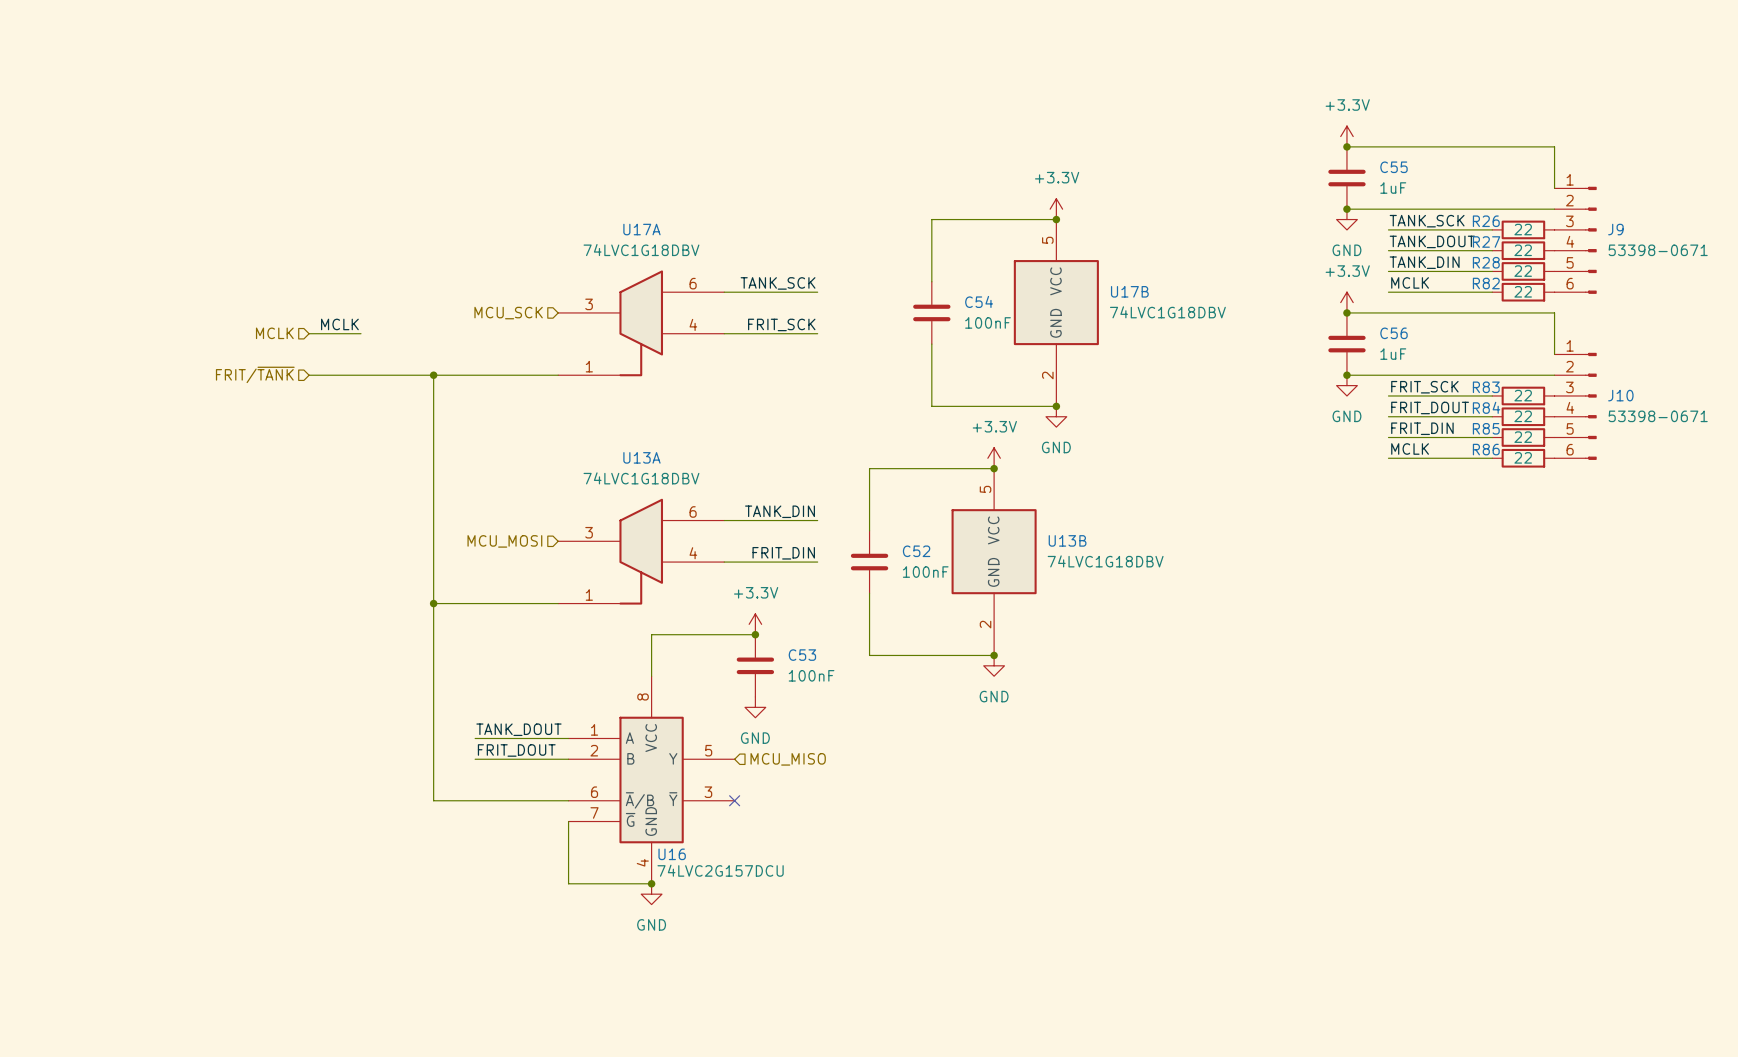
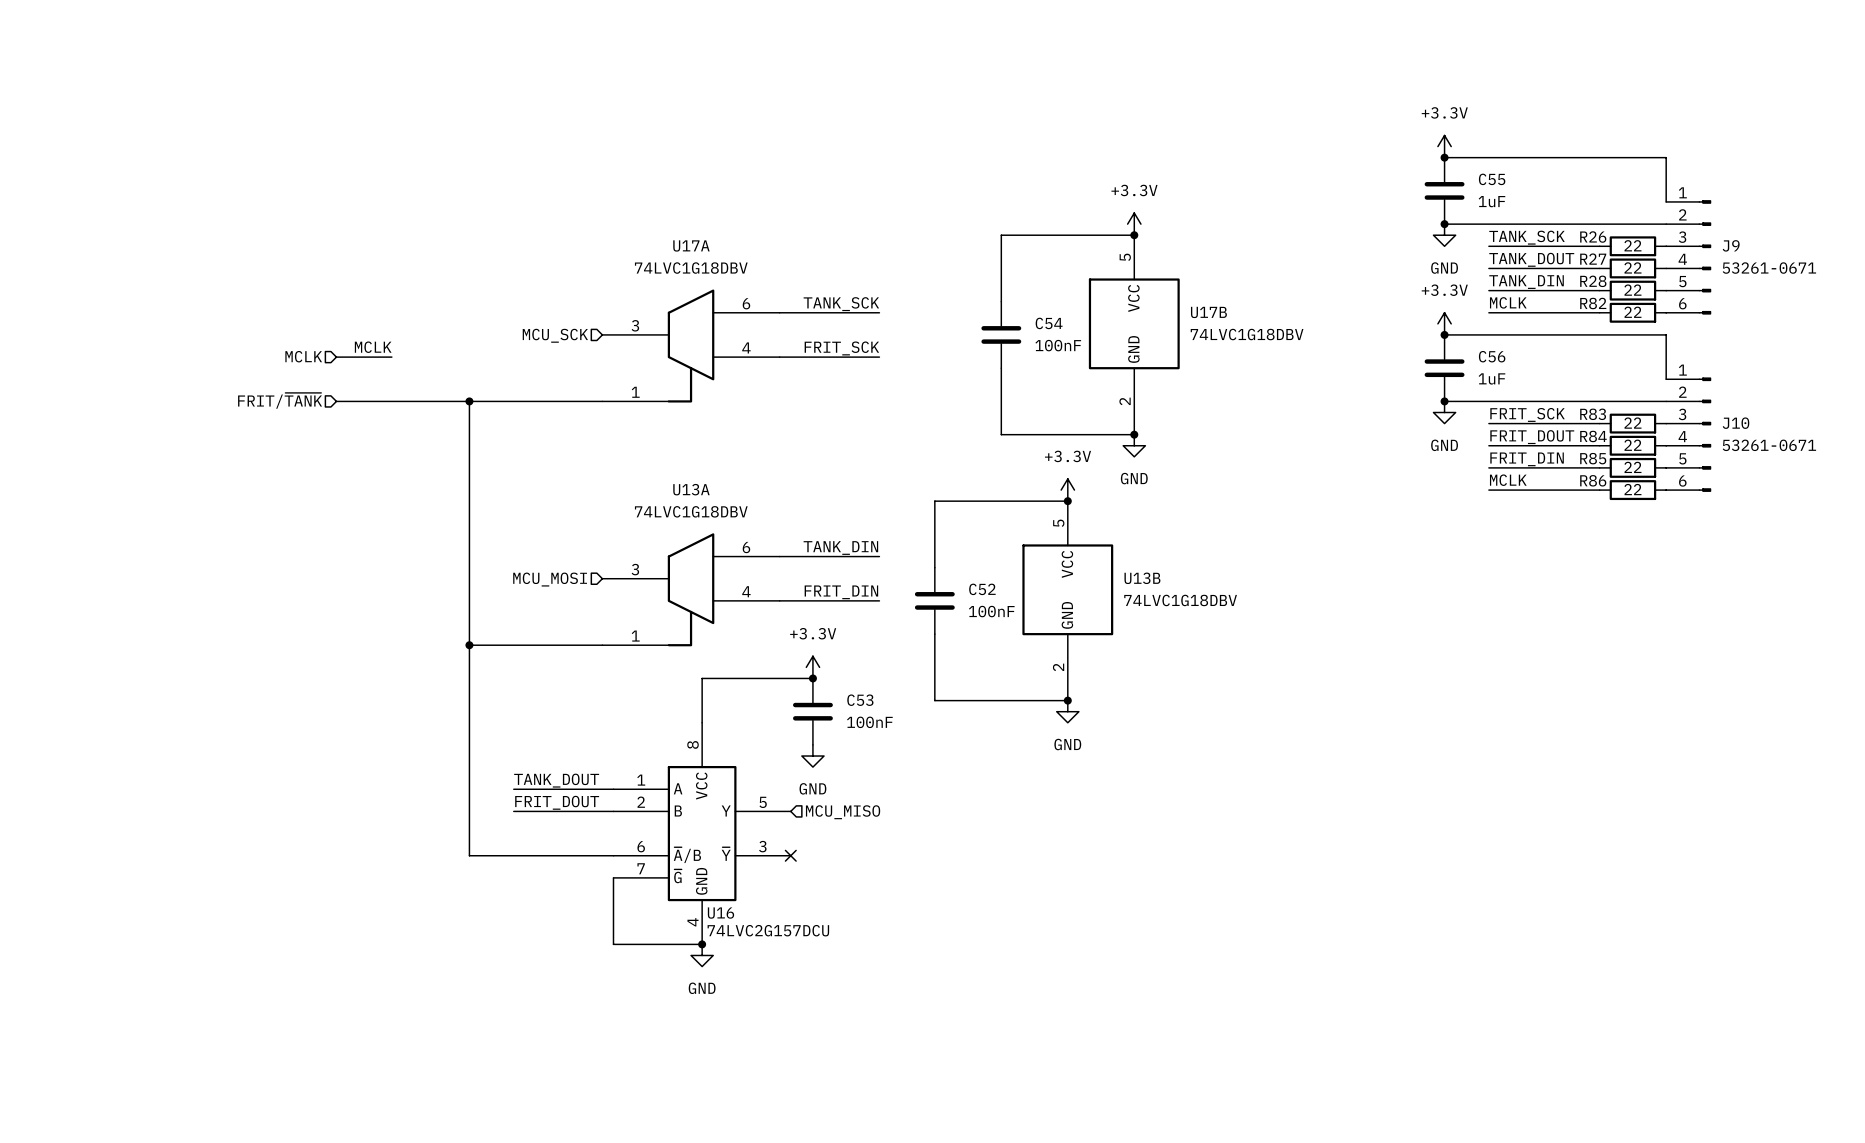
J9 value: 53398-0671 (1658, 250) -> 53261-0671 (1769, 268)
J10 value: 53398-0671 (1658, 416) -> 53261-0671 (1769, 445)

